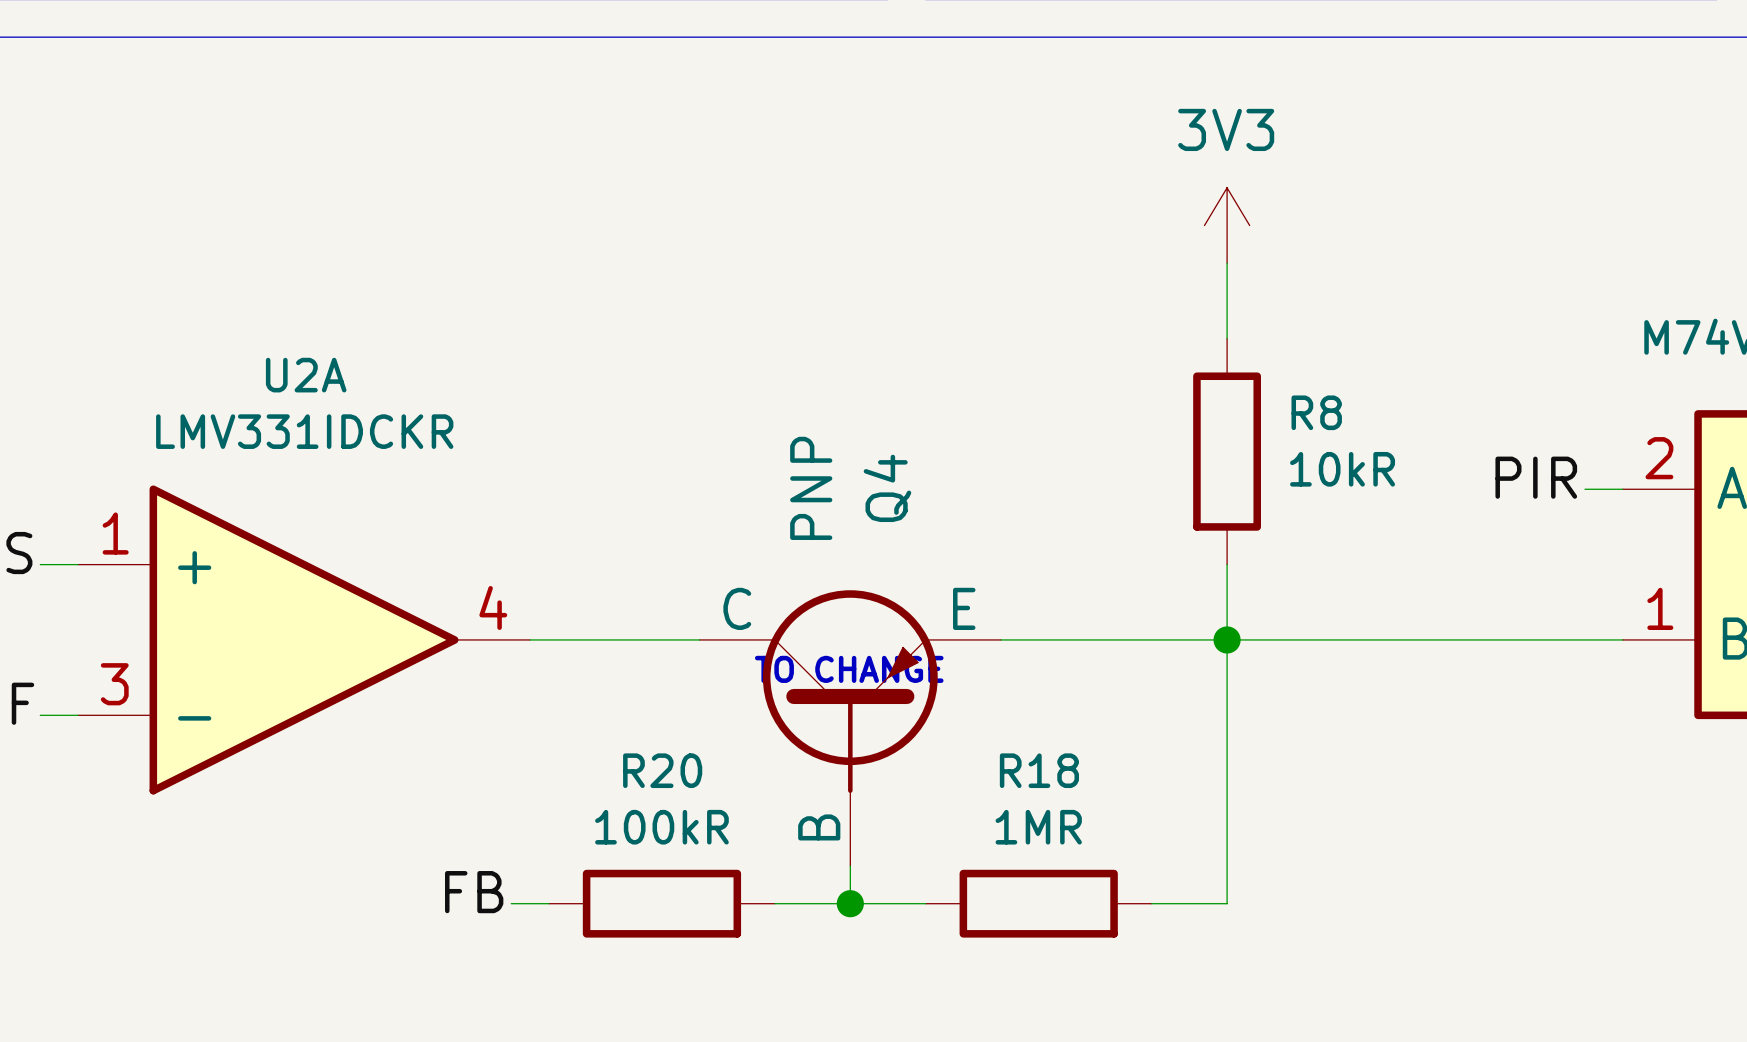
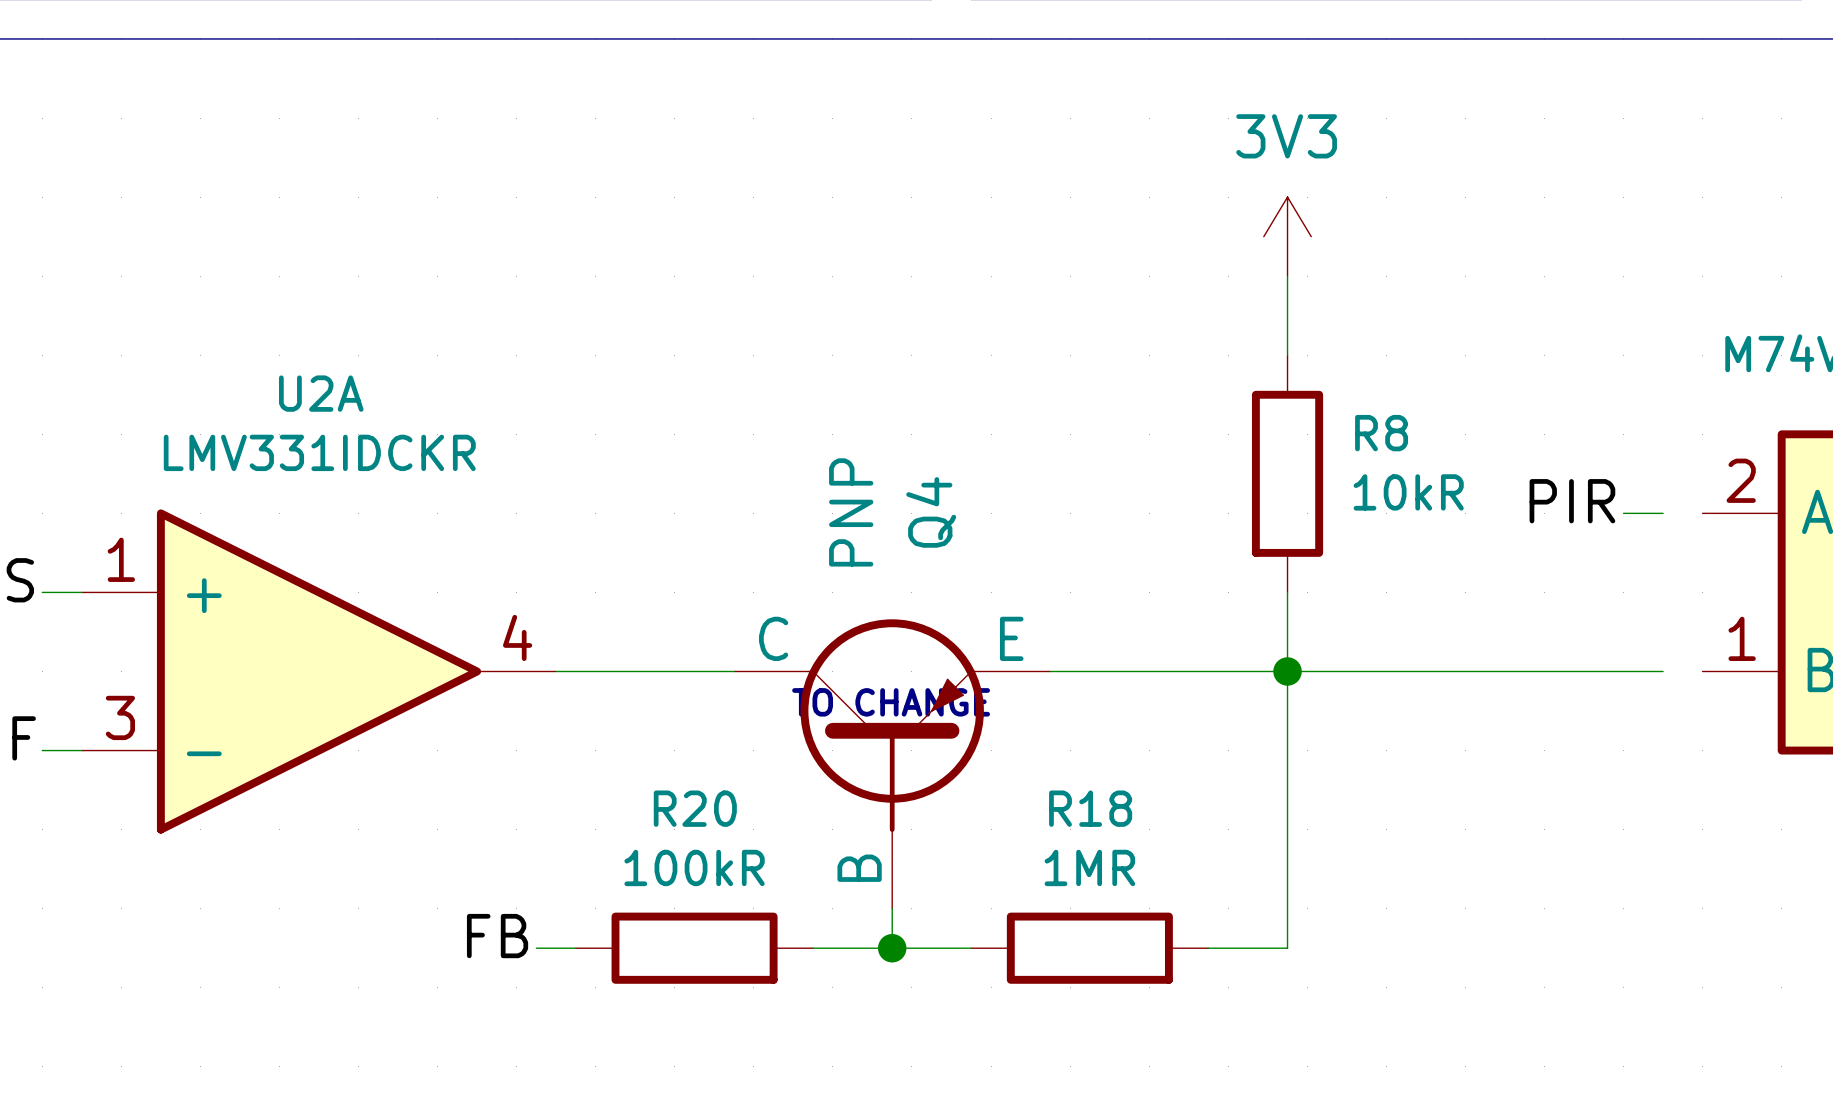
label position: PIR (1536, 477) -> PIR (1572, 501)
wire: (1585, 489) (1622, 489) -> (1663, 513) (1623, 513)
wire: (1585, 639) (1622, 639) -> none

